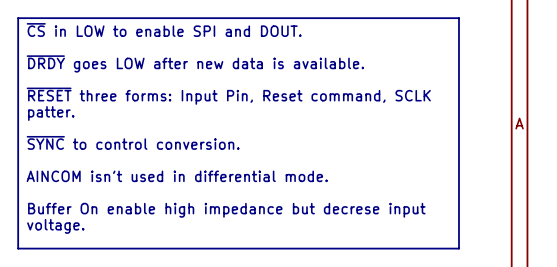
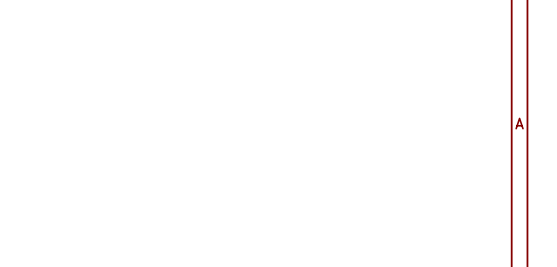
line: (18, 18) (458, 18) (458, 248) (18, 248) (18, 18) -> none
text: ~{CS} in LOW to enable SPI and DOUT. (164, 30) -> none
text: ~{DRDY} goes LOW after new data is available. (195, 63) -> none
text: ~{RESET} three forms: Input Pin, Reset command, SCLK (228, 96) -> none
text: patter. (51, 113) -> none
text: ~{SYNC} to control conversion. (133, 142) -> none
text: AINCOM isn't used in differential mode. (177, 176) -> none
text: Buffer On enable high impedance but decrese input (226, 210) -> none
text: voltage. (55, 226) -> none

